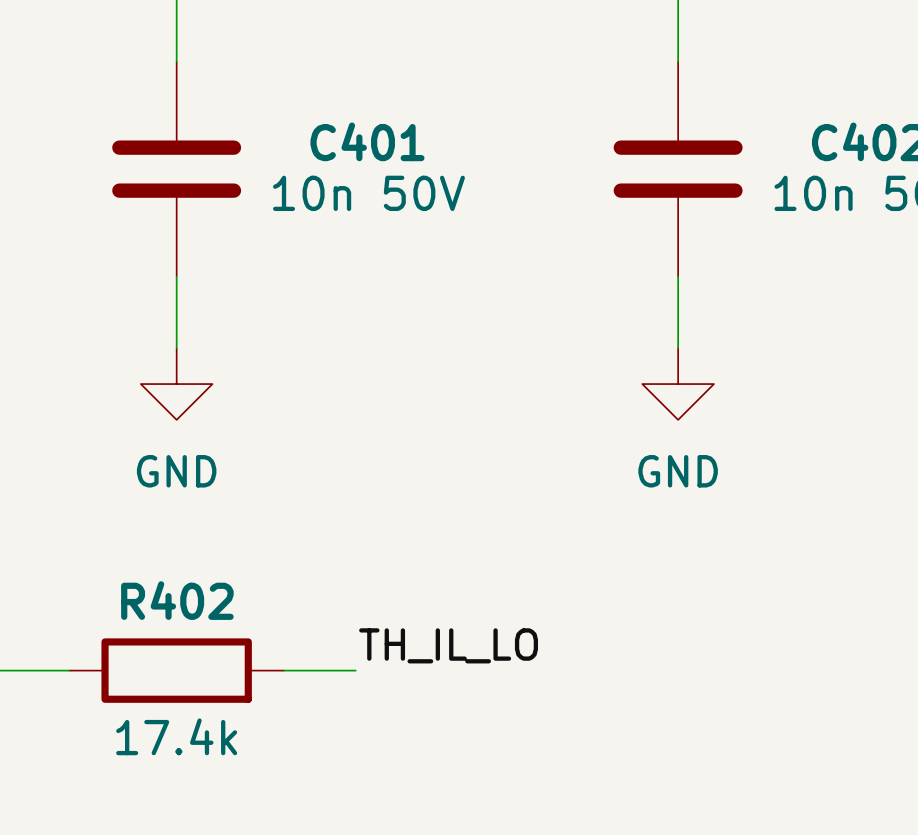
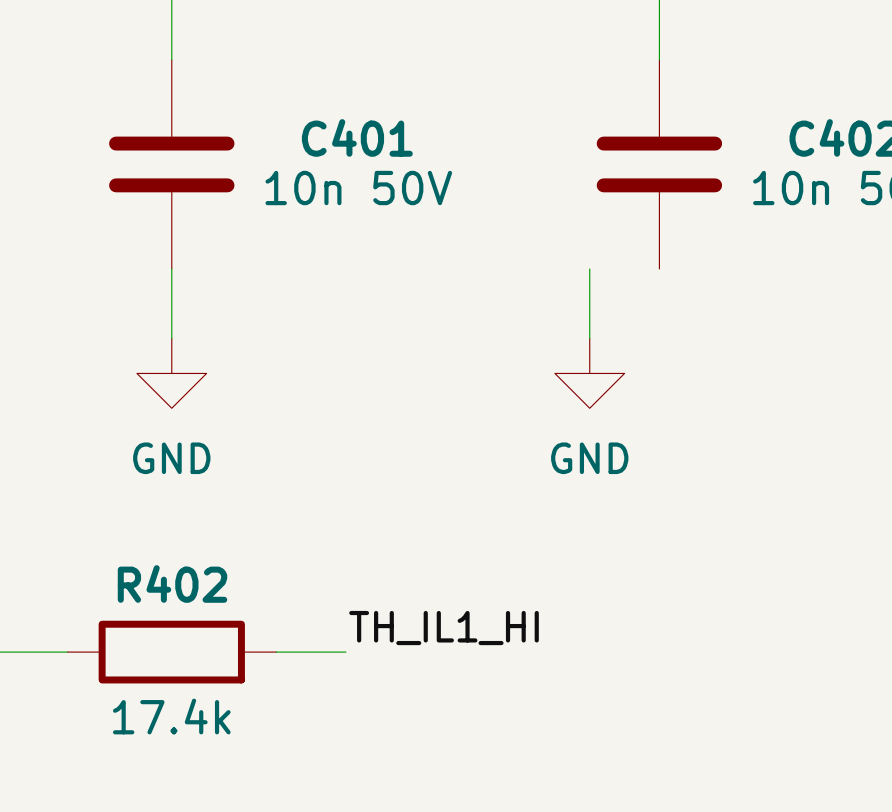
wire: (678, 276) (678, 348) -> (589, 268) (589, 338)
power symbol position: GND (678, 384) -> GND (589, 373)
label: TH_IL_LO (448, 645) -> TH_IL1_HI (444, 628)

